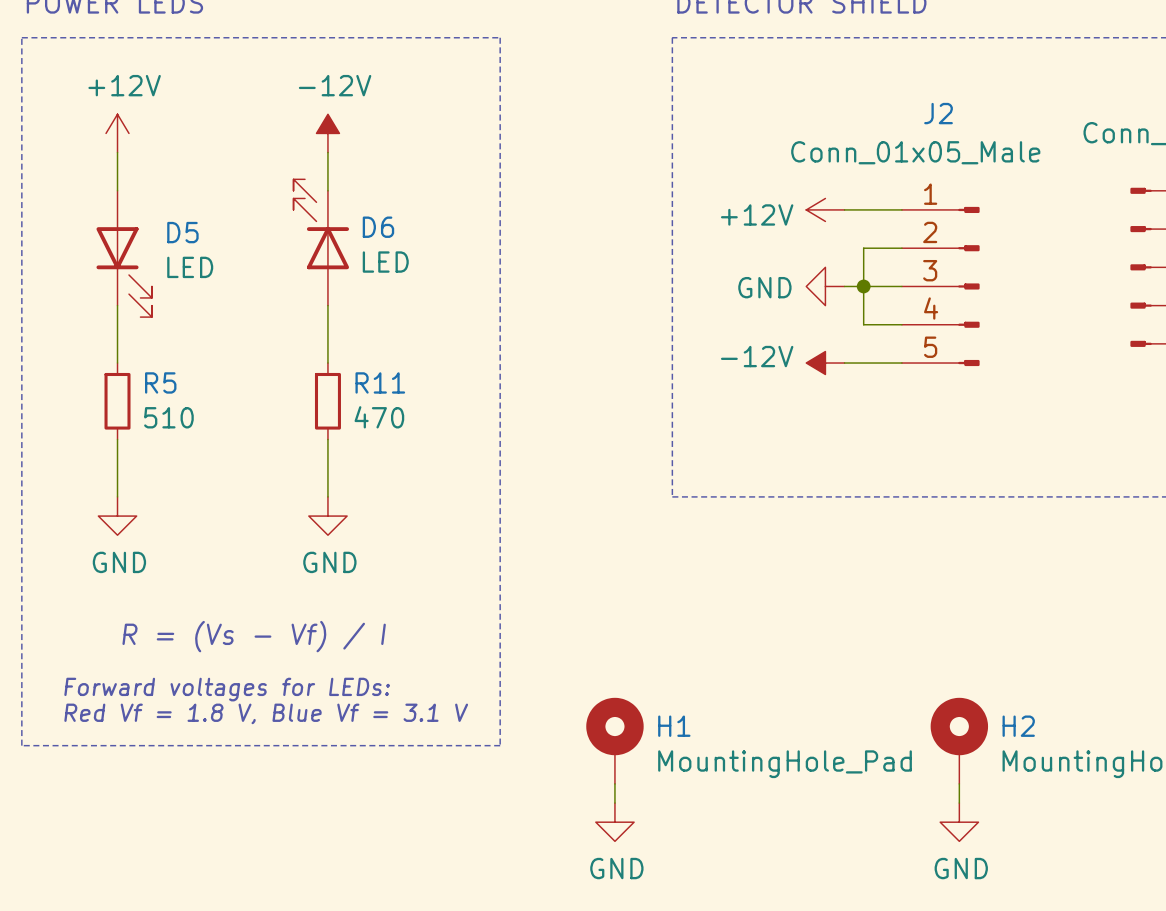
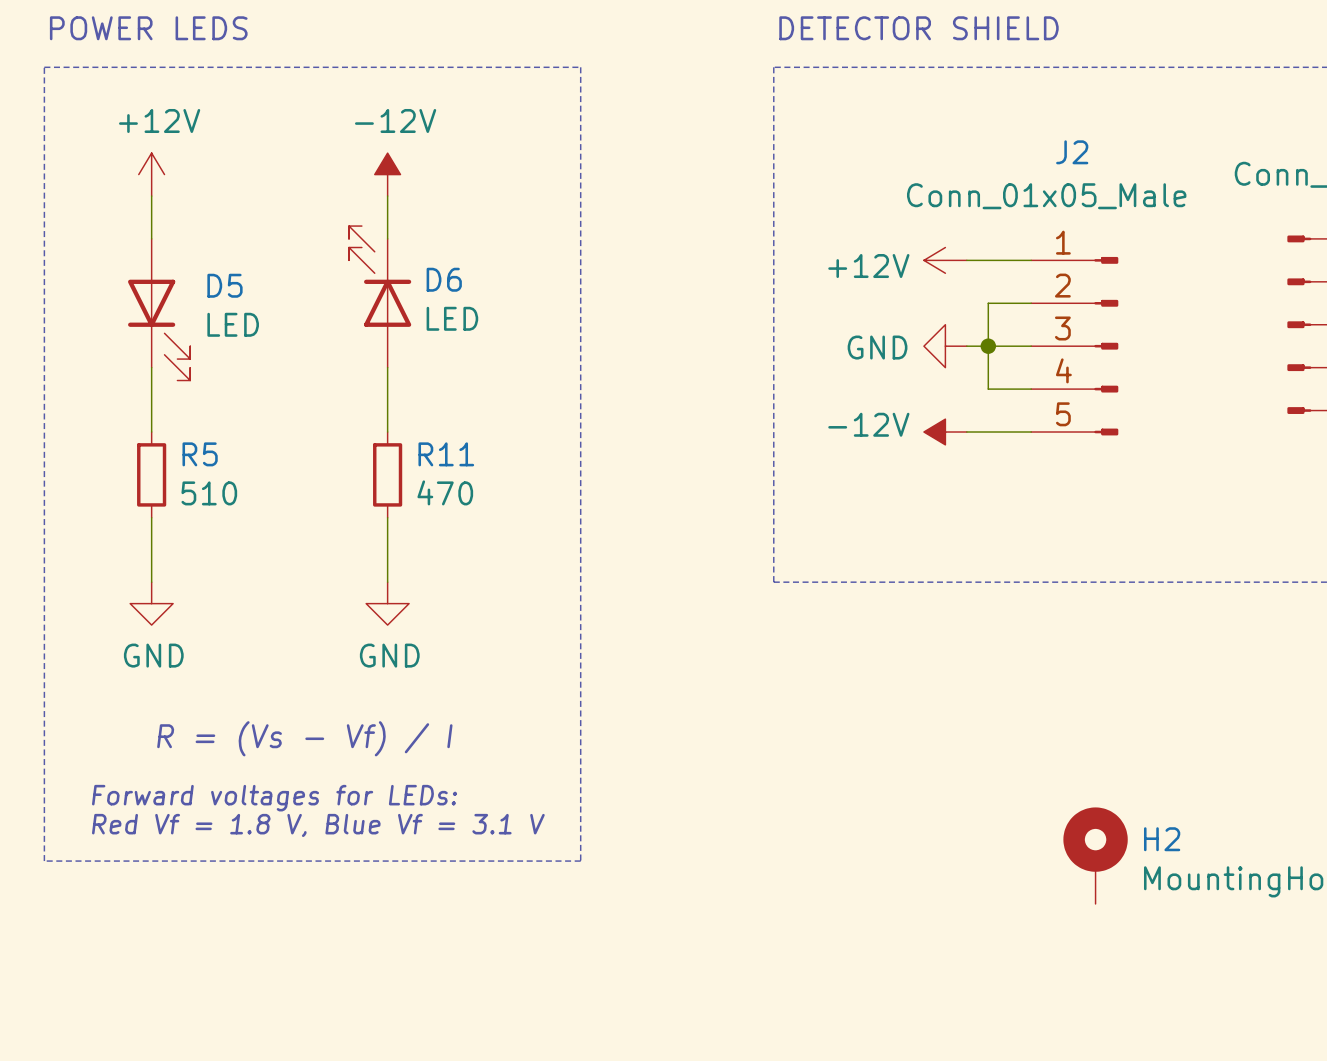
H1: MountingHole_Pad (614, 740) -> none
wire: (614, 783) (614, 803) -> none
wire: (959, 783) (959, 803) -> none
power symbol: GND (614, 822) -> none
power symbol: GND (959, 822) -> none

